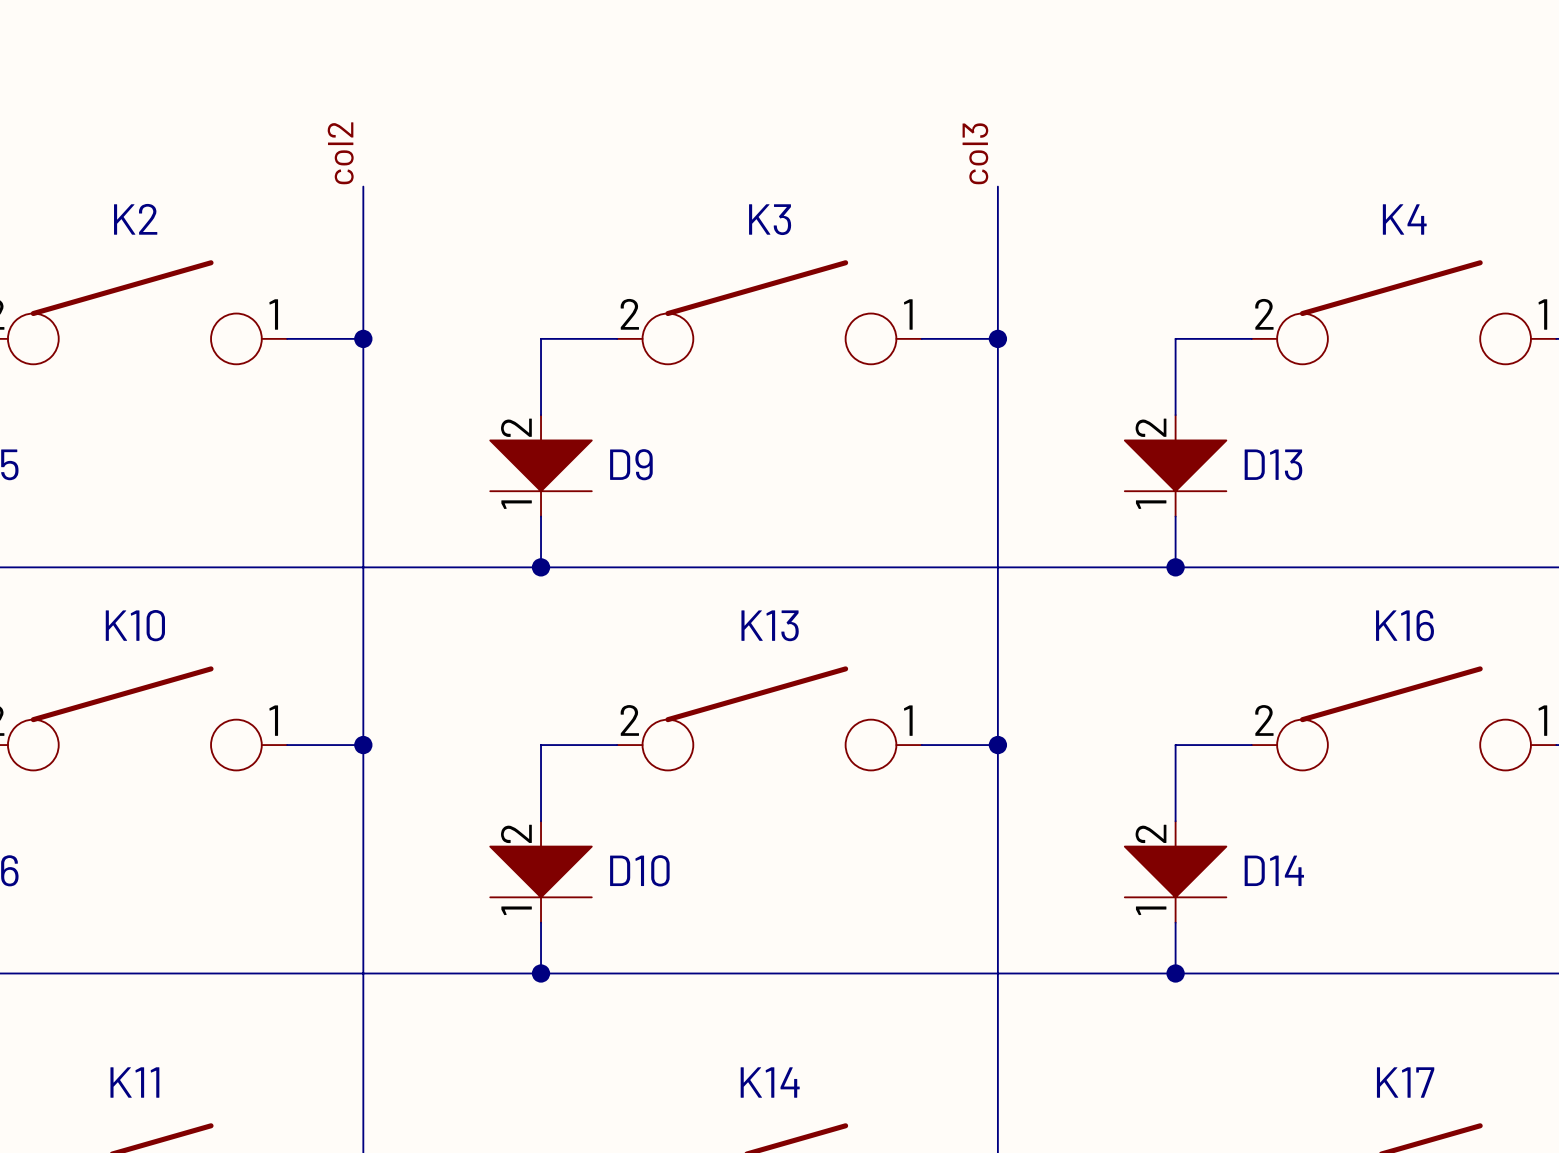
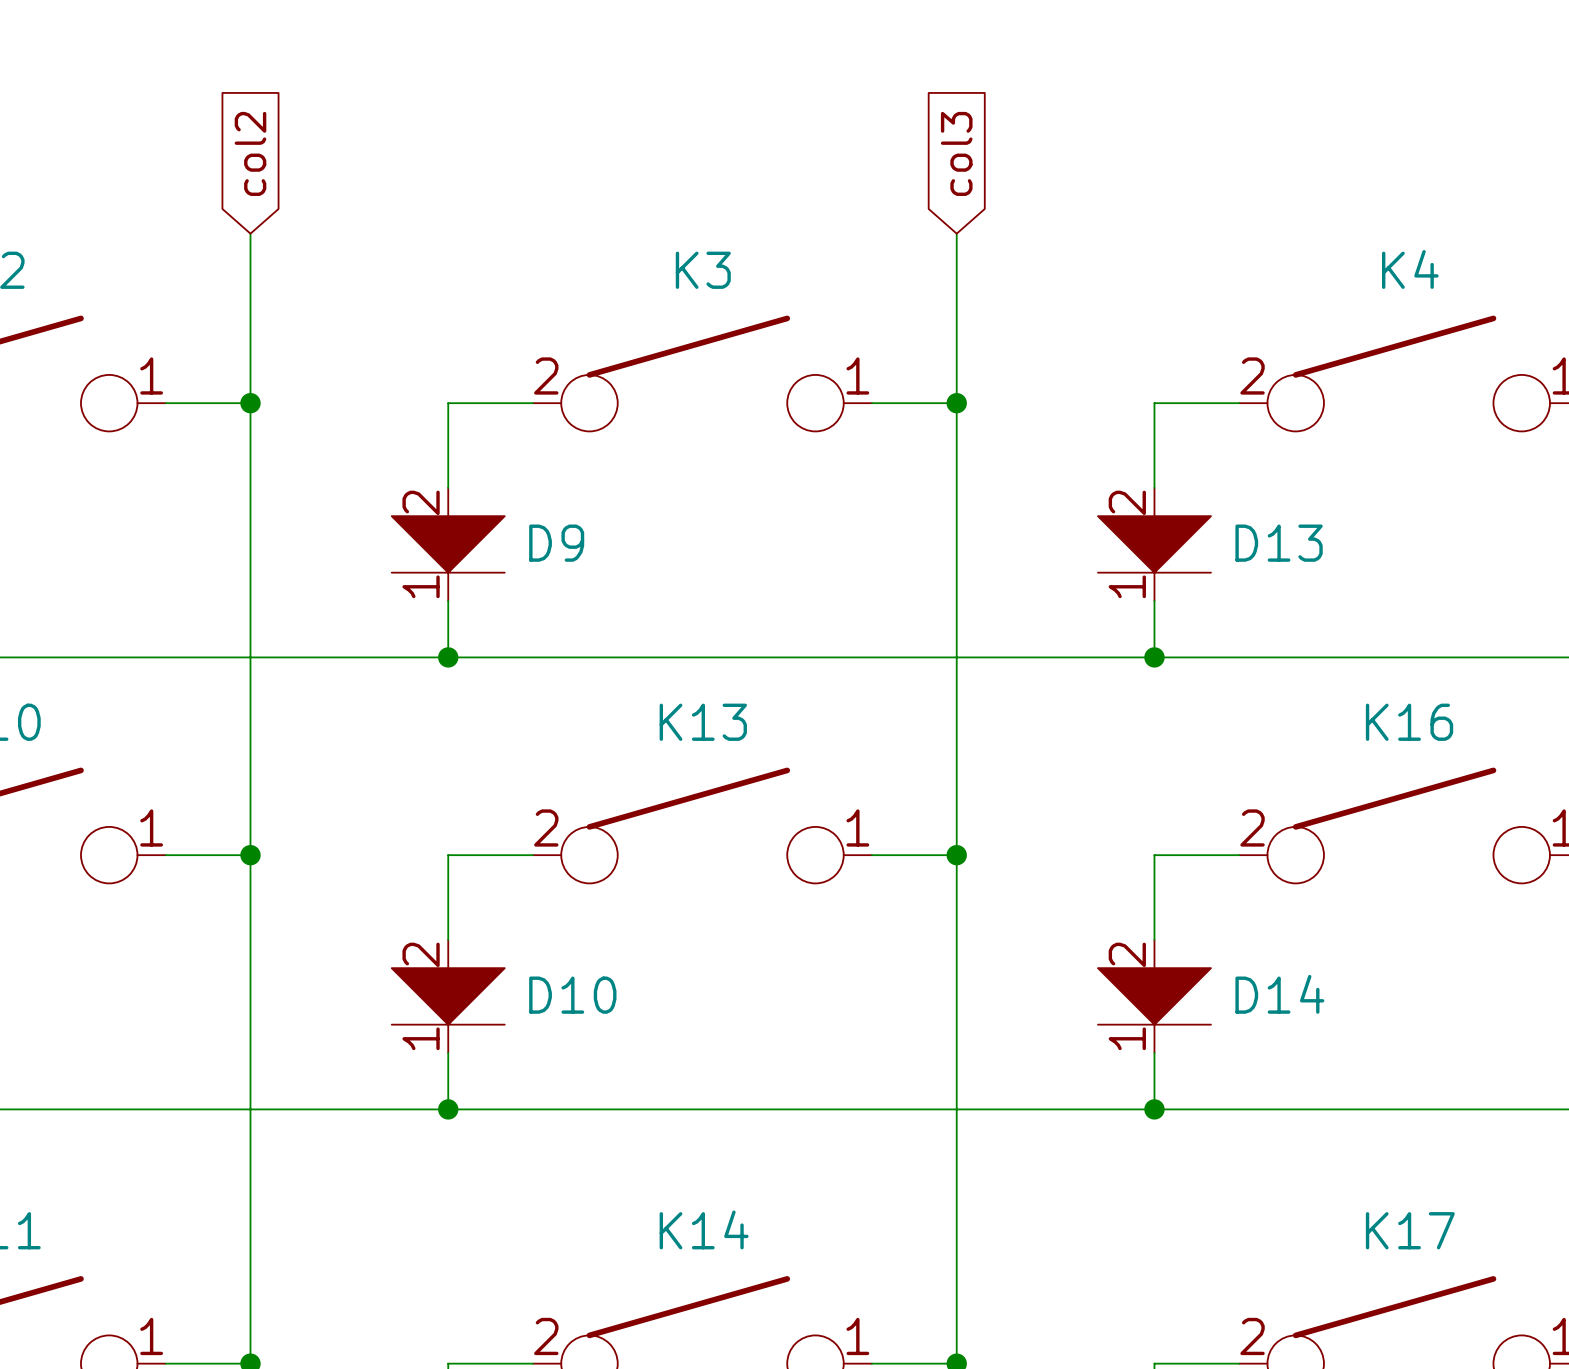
global label: none -> col2 (250, 153)
global label: none -> col3 (956, 153)
label: col2 (340, 153) -> none
label: col3 (975, 153) -> none

